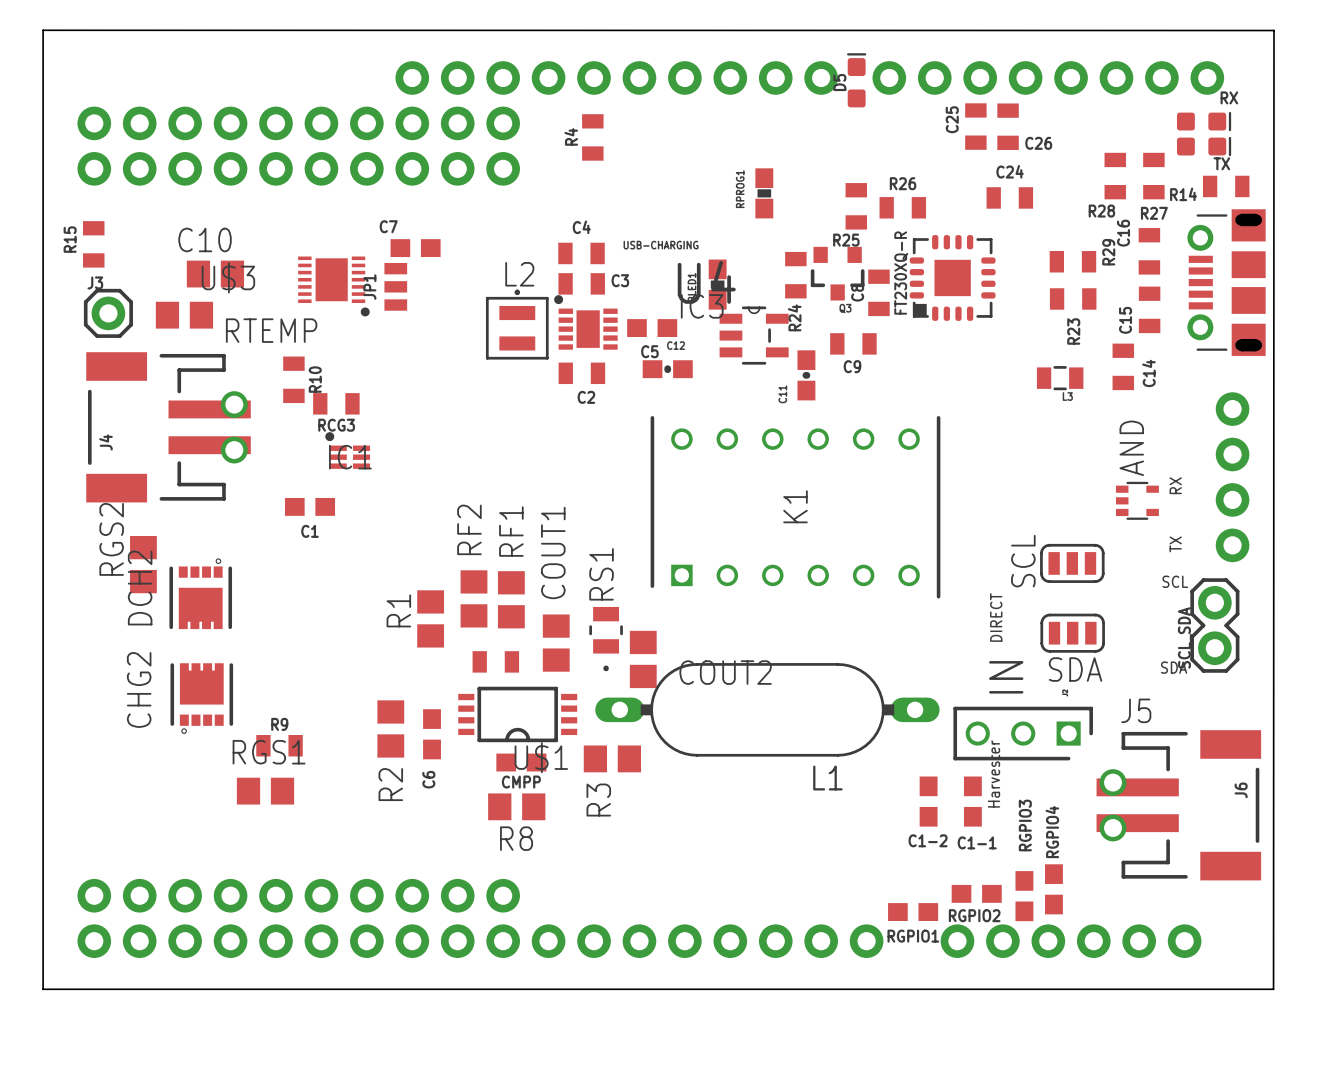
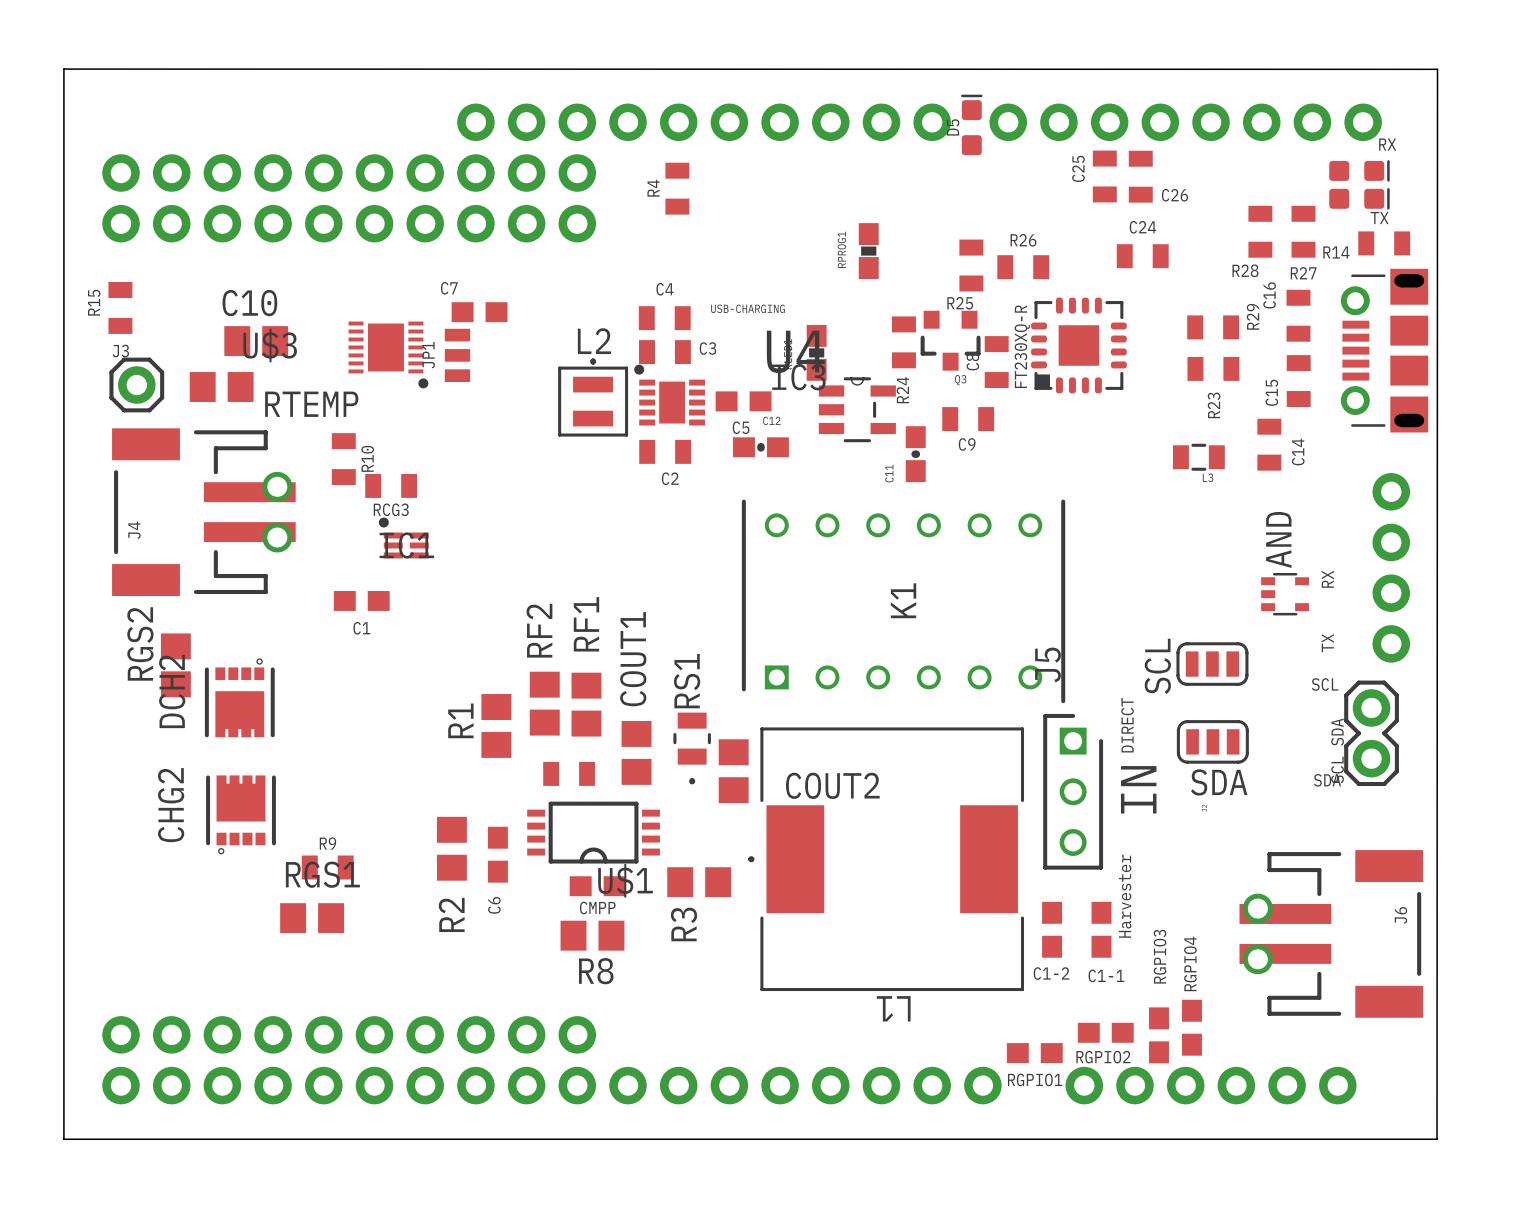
L1 footprint: [595, 663, 940, 757] -> [748, 727, 1025, 992]
J5 rotation: 0° (1023, 733) -> 90° counterclockwise (1073, 791)
J5 position: (1023, 733) -> (1073, 791)
L1 name position: L1 (827, 778) -> L1 (893, 1008)

